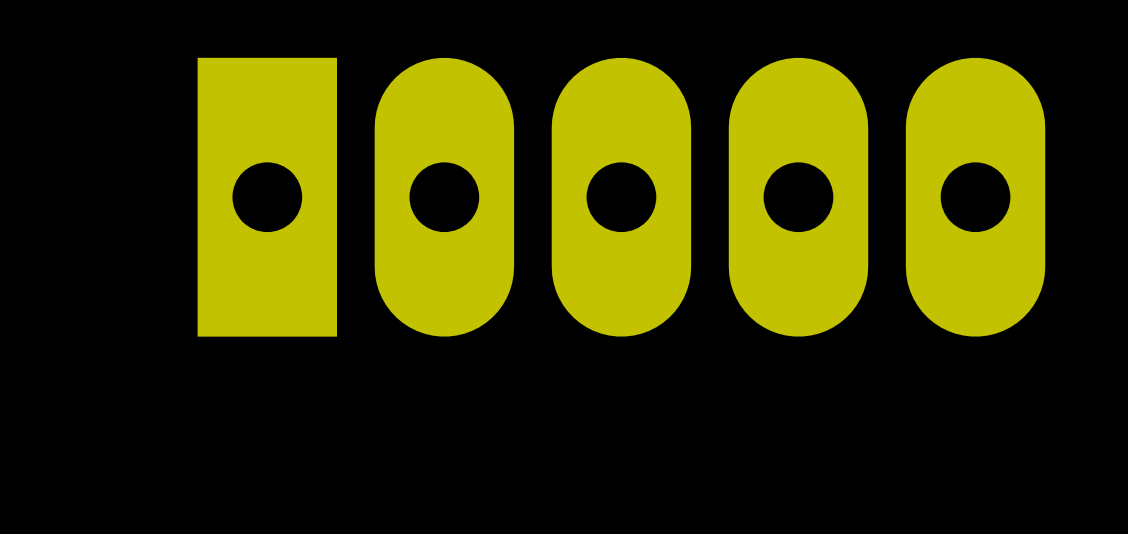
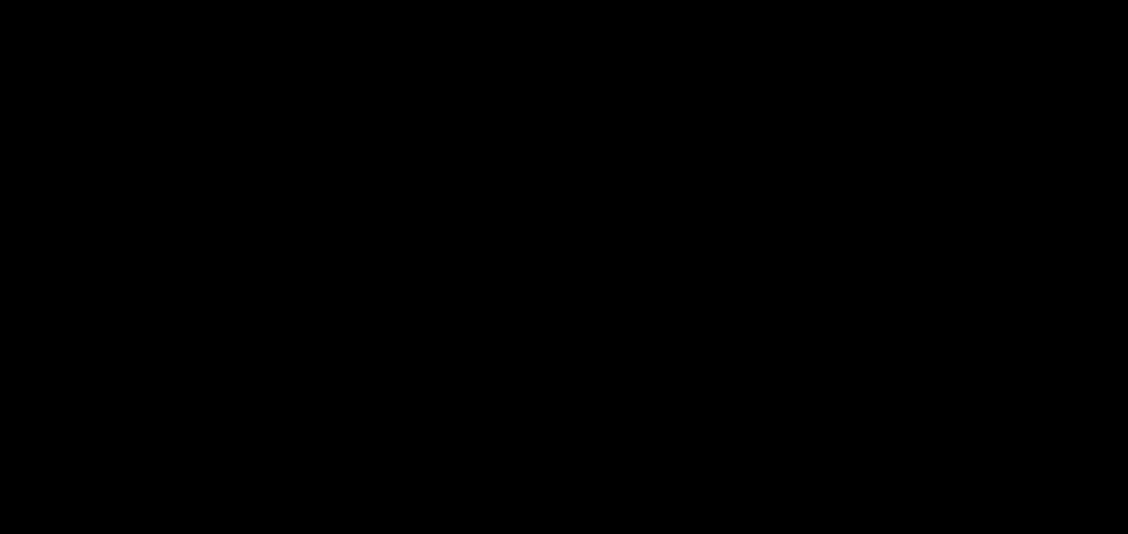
part: (621, 197) -> none

